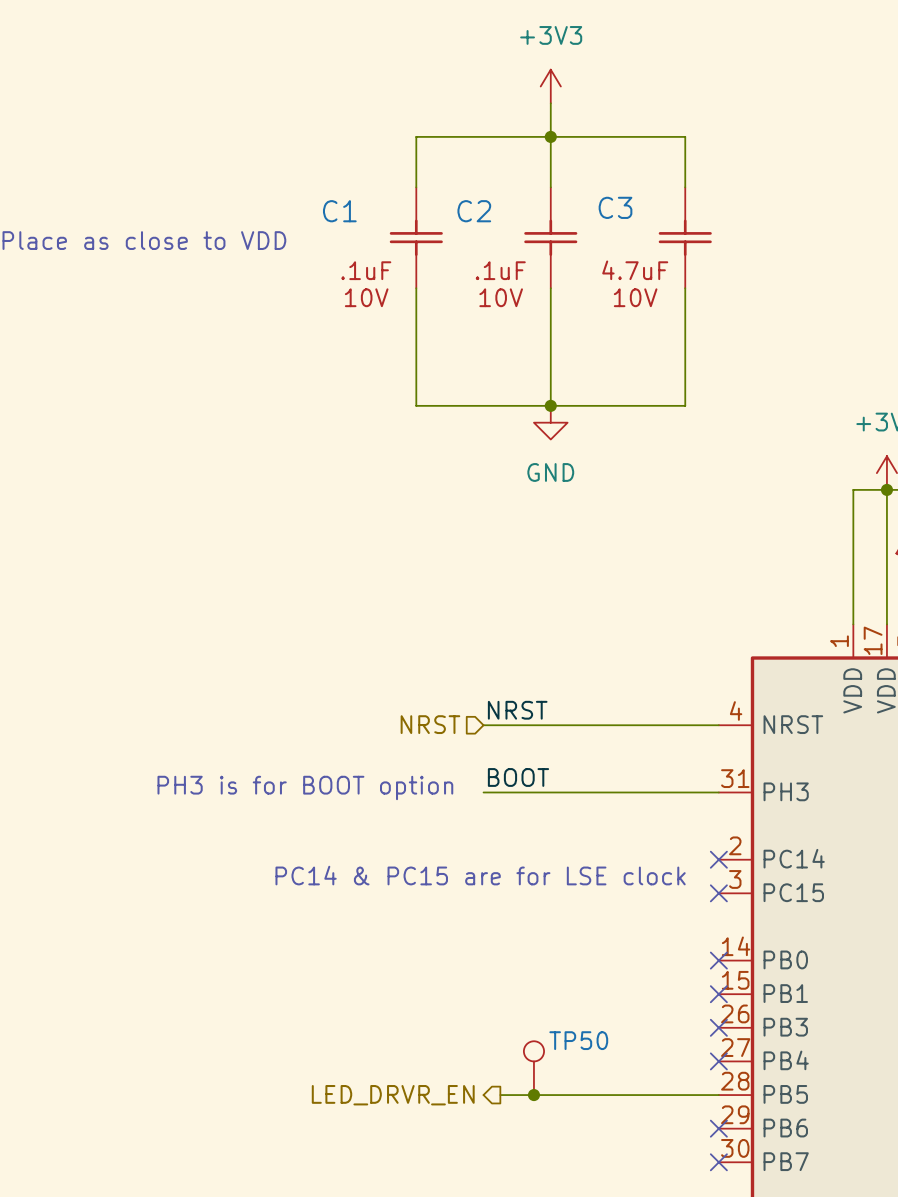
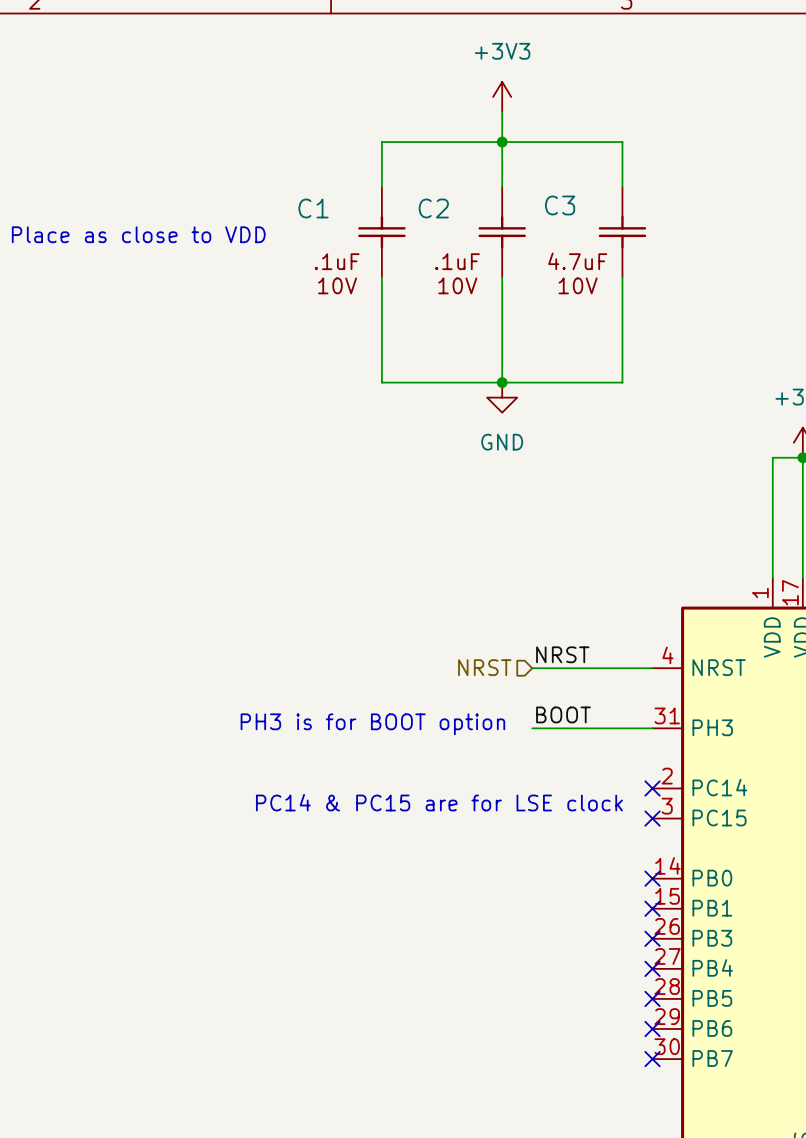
label position: NRST (517, 710) -> NRST (562, 654)
hierarchical label position: NRST (430, 724) -> NRST (484, 667)
wire: (483, 725) (584, 725) -> none
label position: BOOT (518, 777) -> BOOT (563, 714)
text position: PH3 is for BOOT option (305, 787) -> PH3 is for BOOT option (372, 724)
wire: (483, 792) (584, 792) -> none
TP50: (533, 1068) -> none
hierarchical label: LED_DRVR_EN (393, 1095) -> none
wire: (500, 1095) (718, 1095) -> none
junction: (533, 1095) -> none
no-connect mark: none -> (652, 998)

